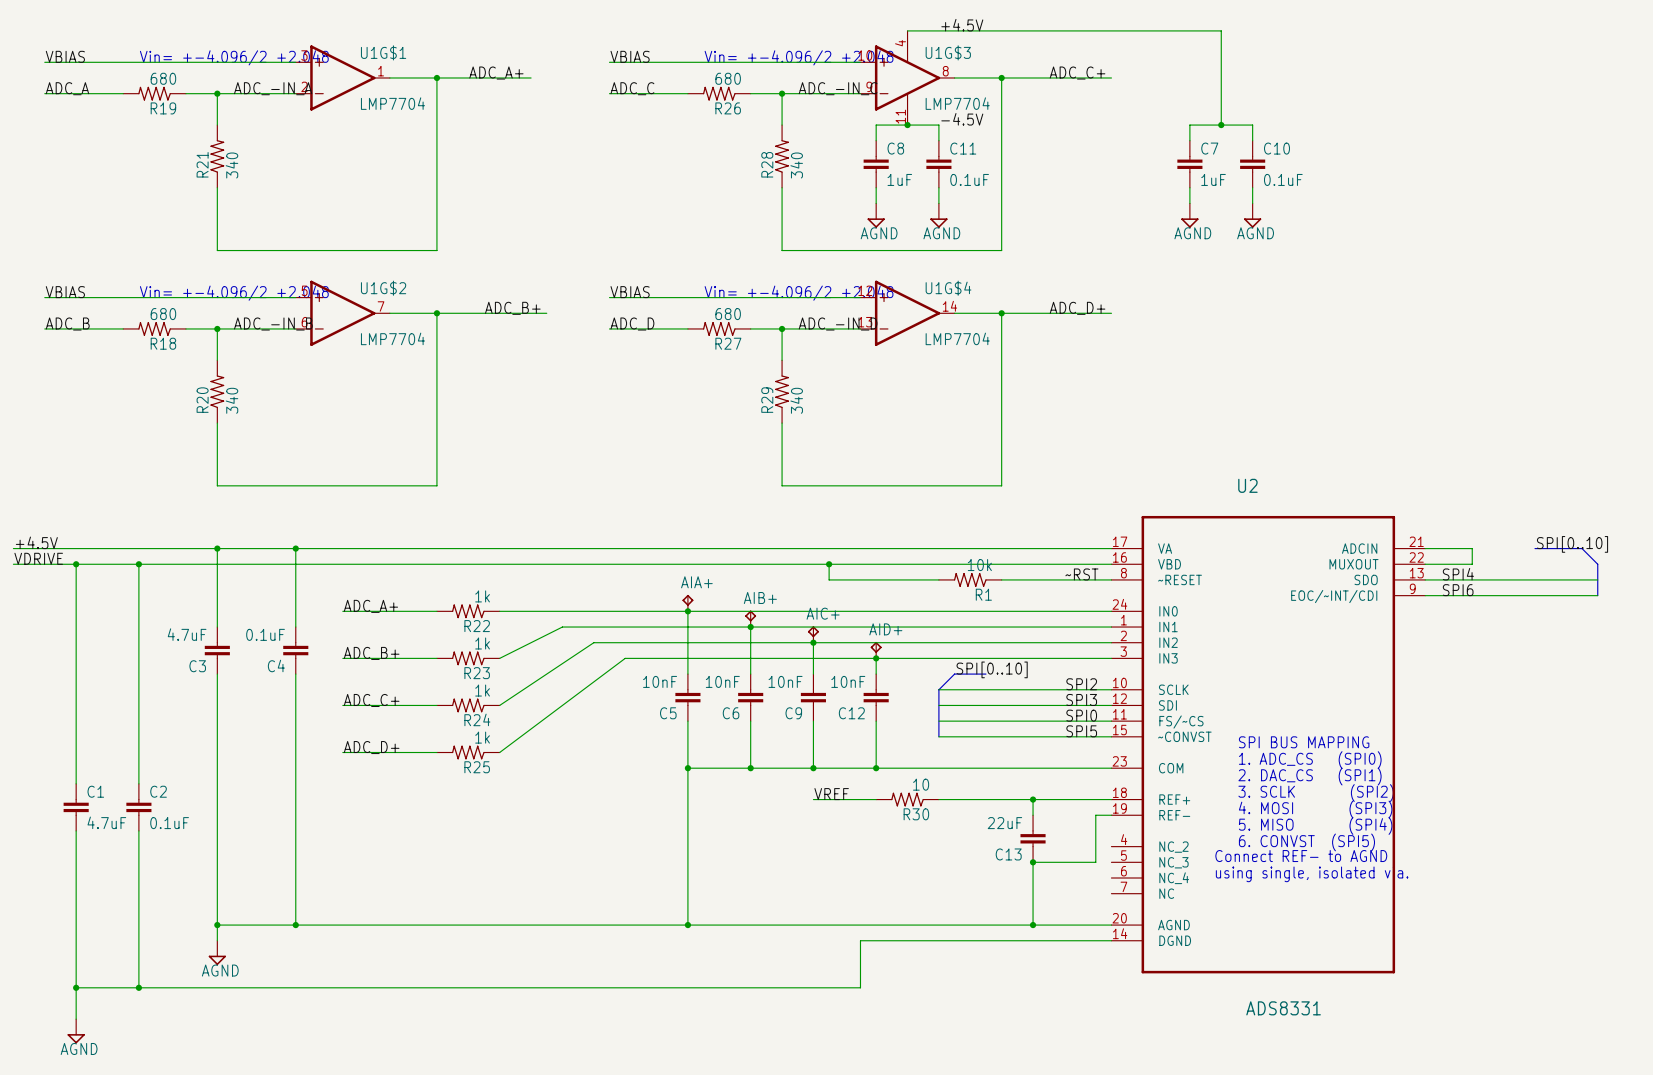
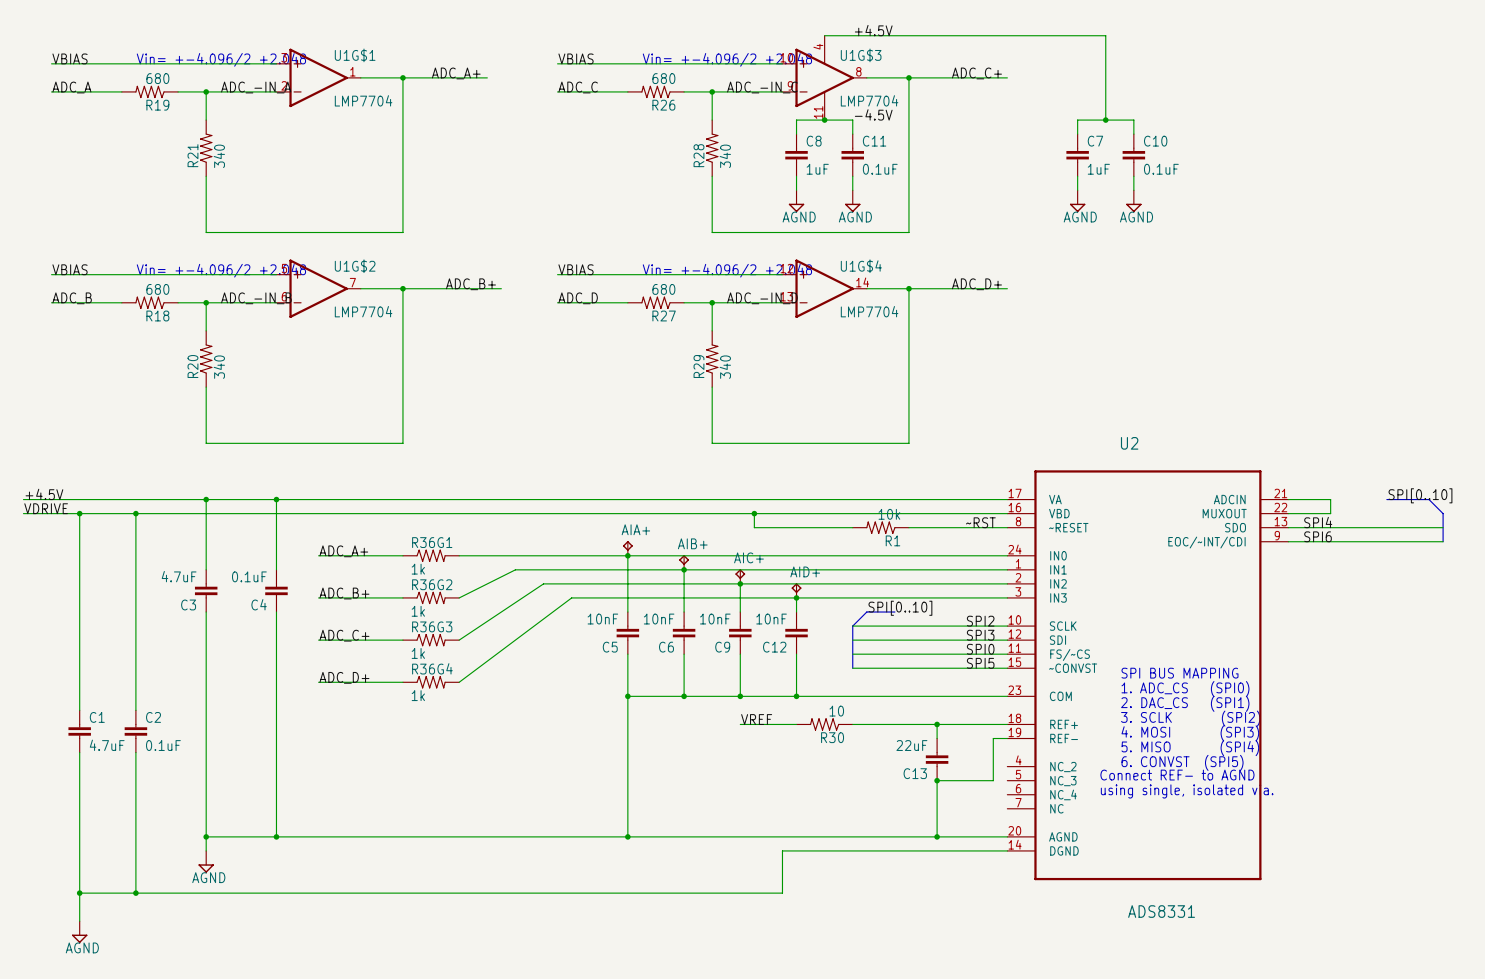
R22: 1k (468, 611) -> none
R36G1: none -> 1k (431, 555)
R23: 1k (468, 658) -> none
R36G2: none -> 1k (431, 597)
R24: 1k (468, 705) -> none
R36G3: none -> 1k (431, 640)
R25: 1k (468, 752) -> none
R36G4: none -> 1k (431, 682)

